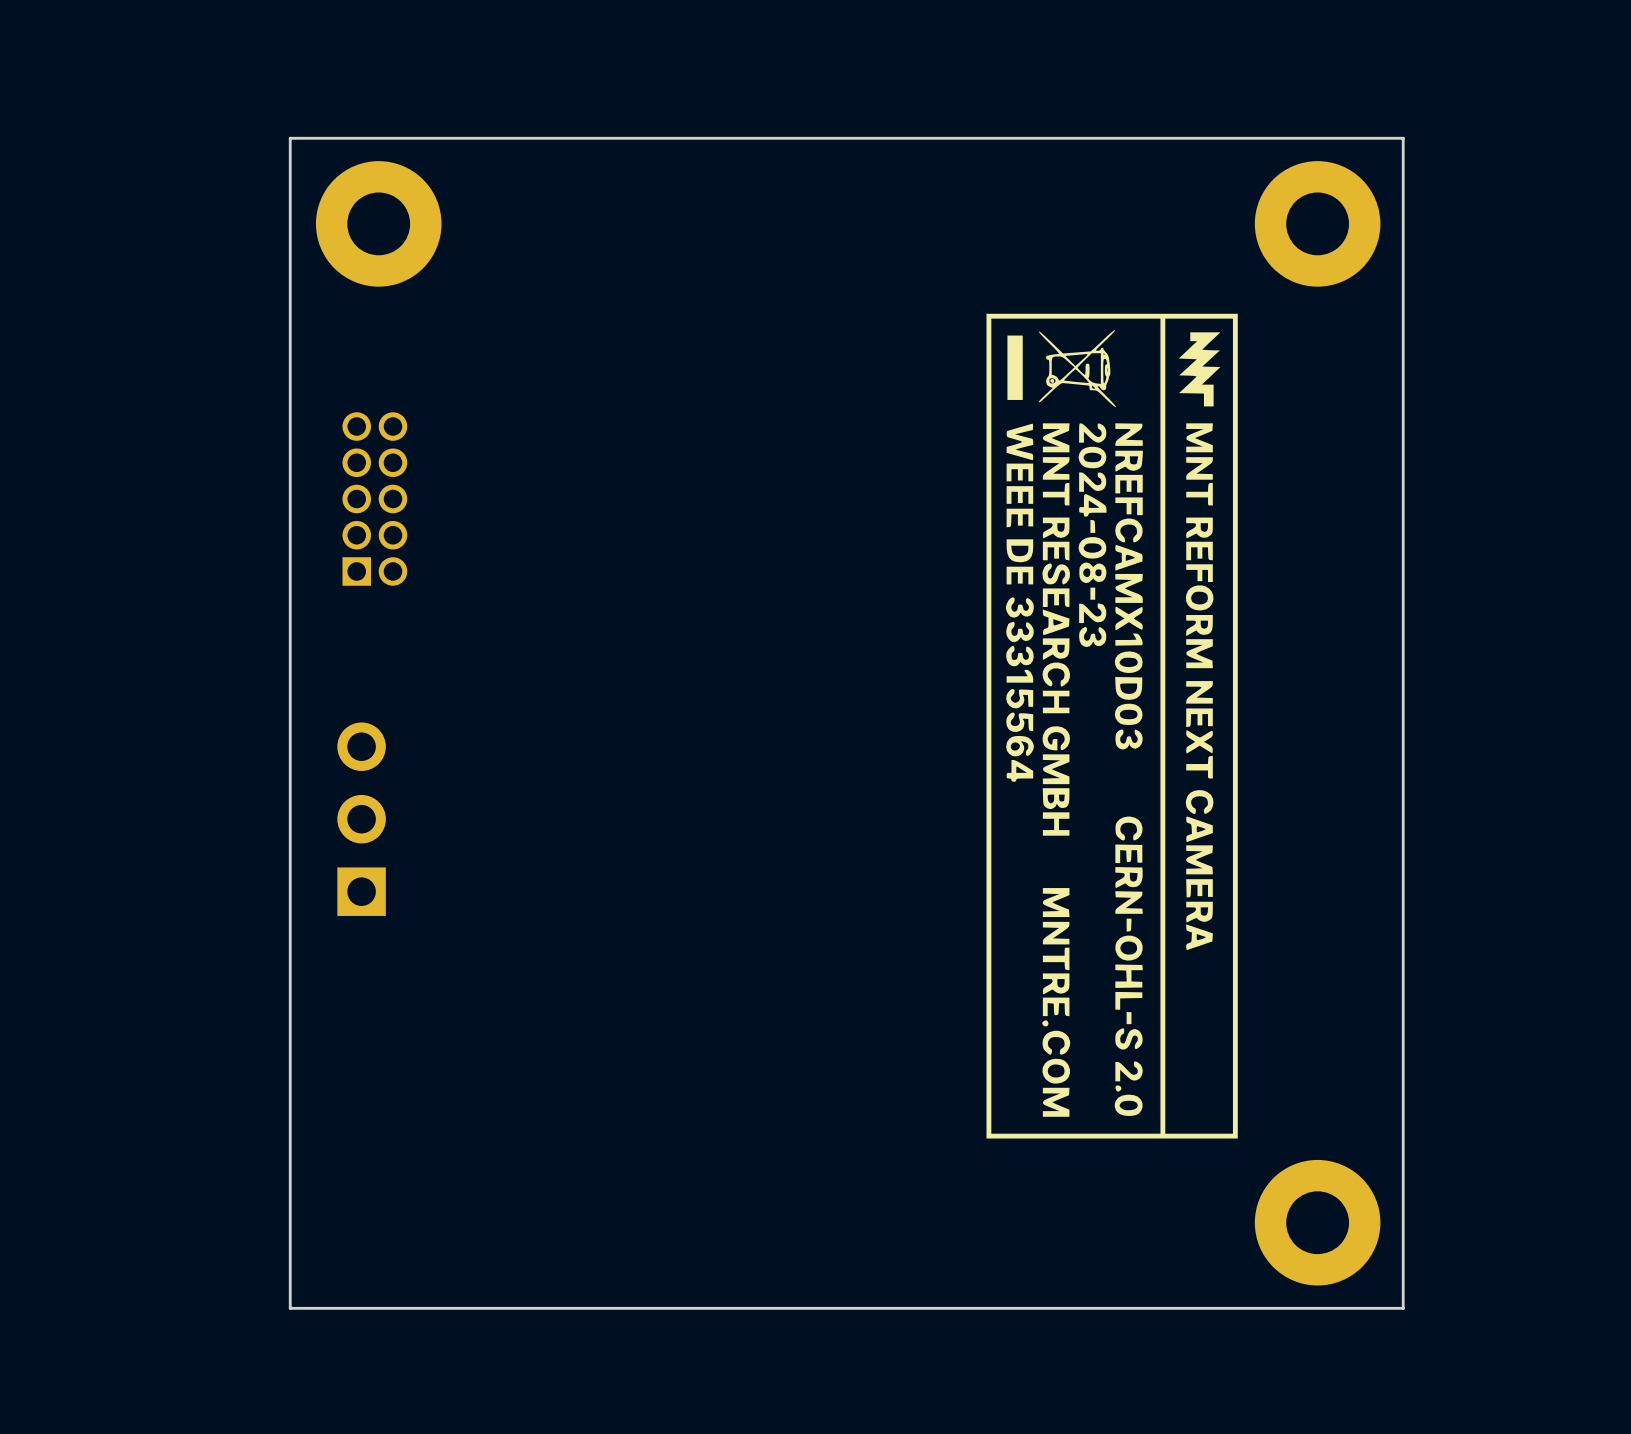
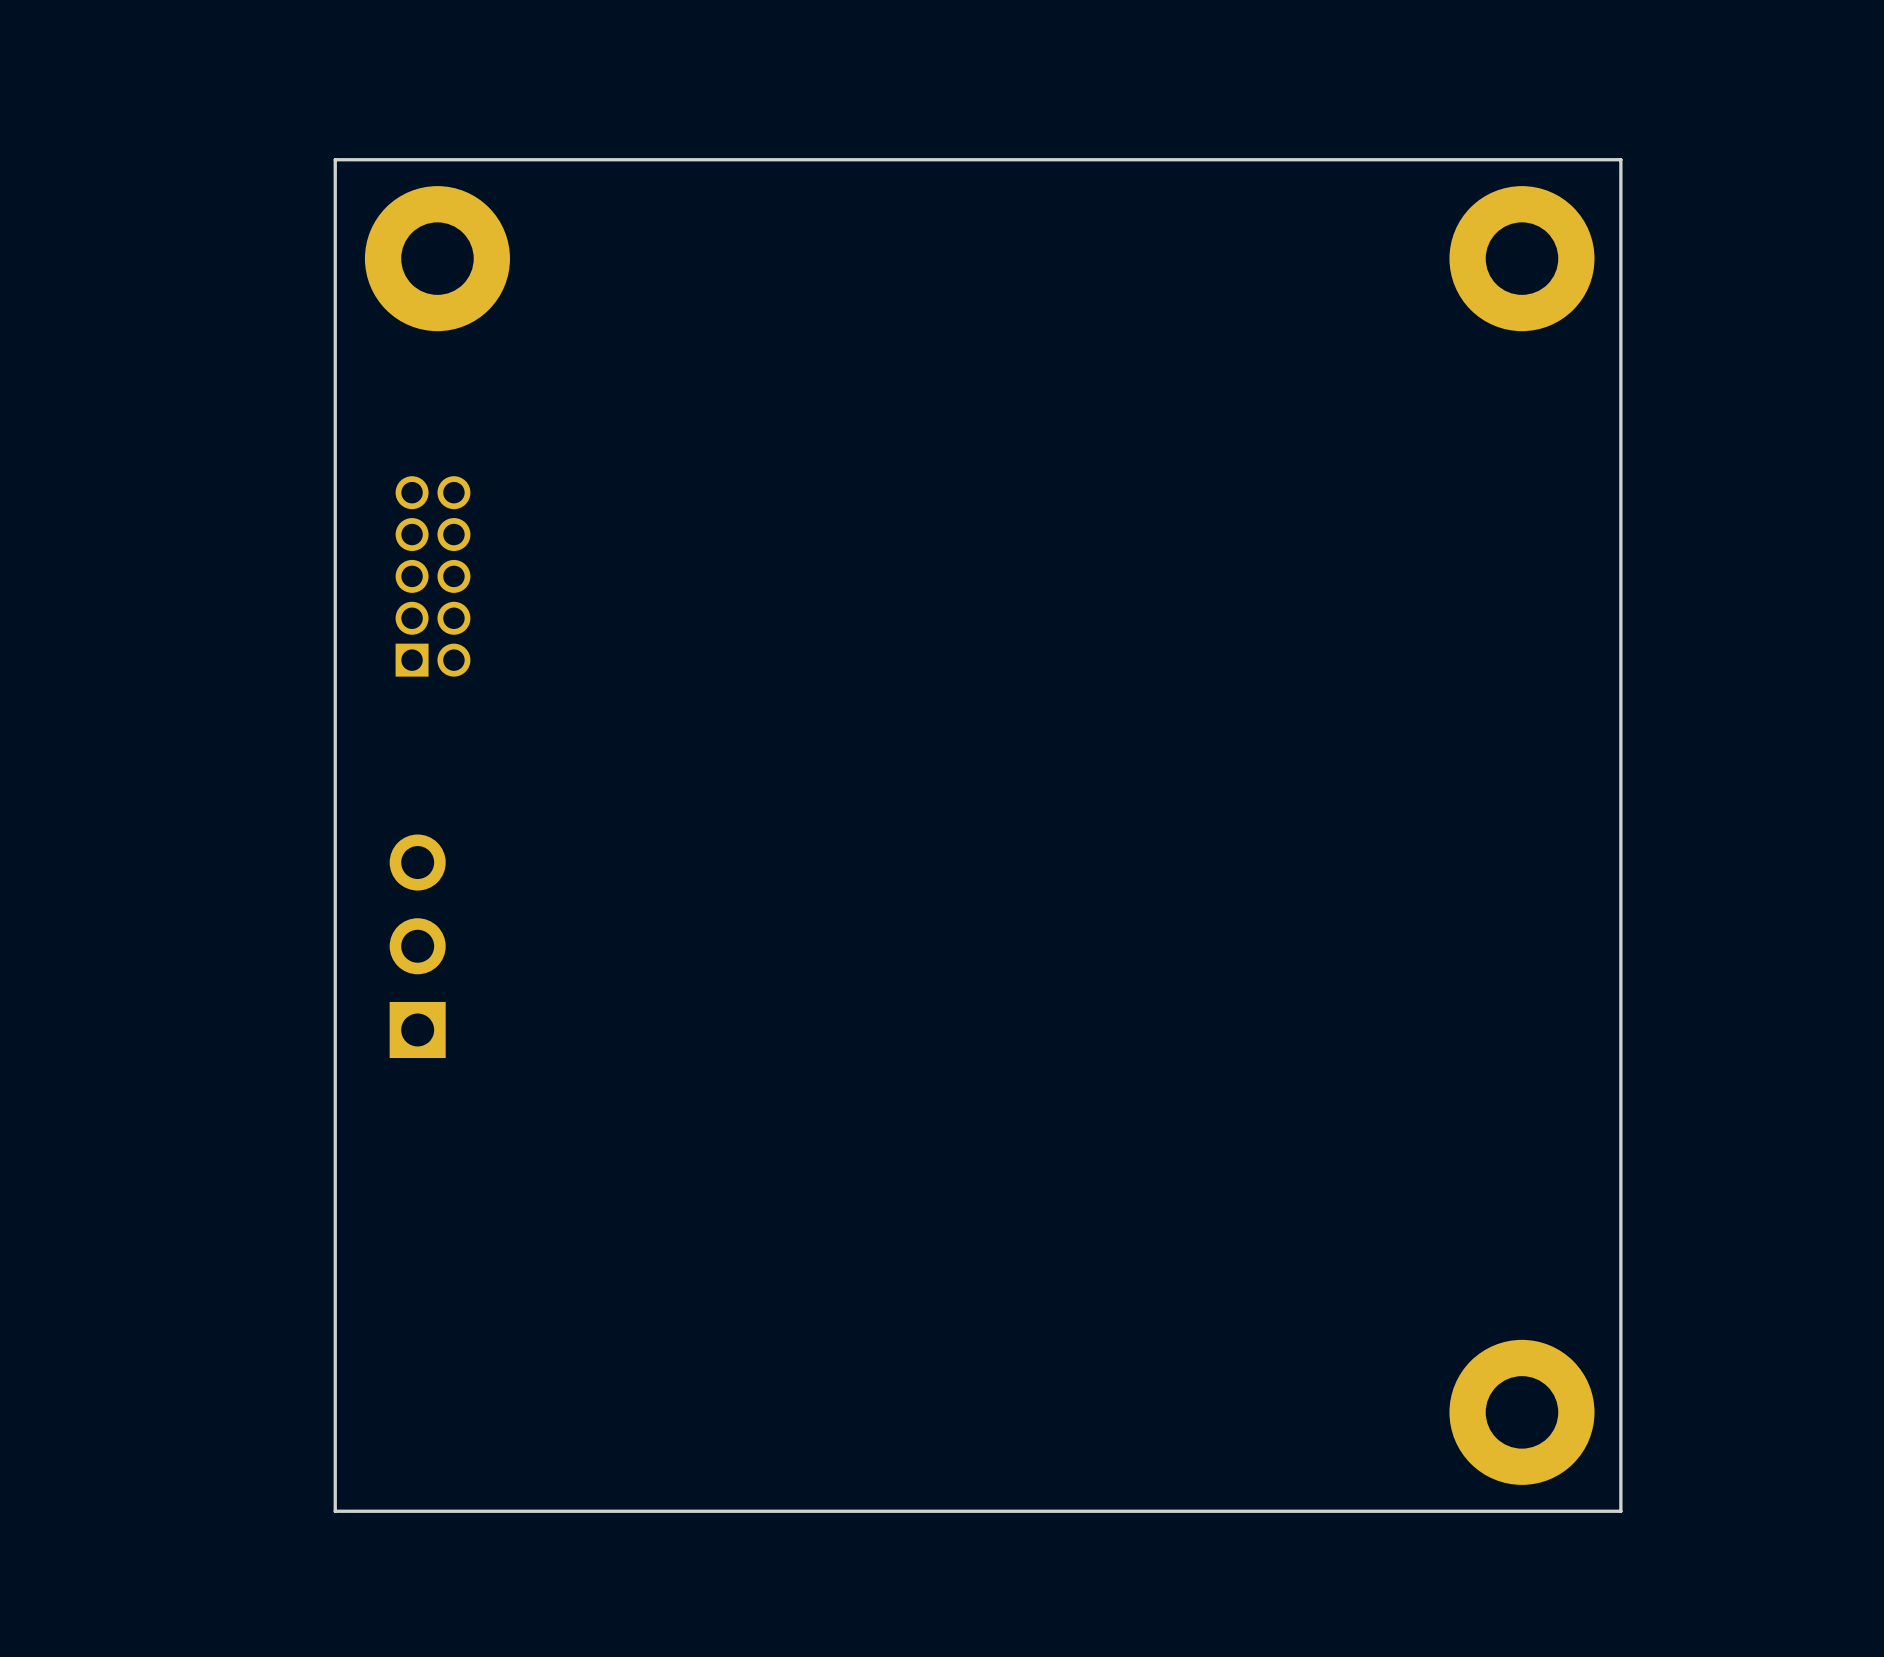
drawing: [986, 313, 1238, 1139] -> none

